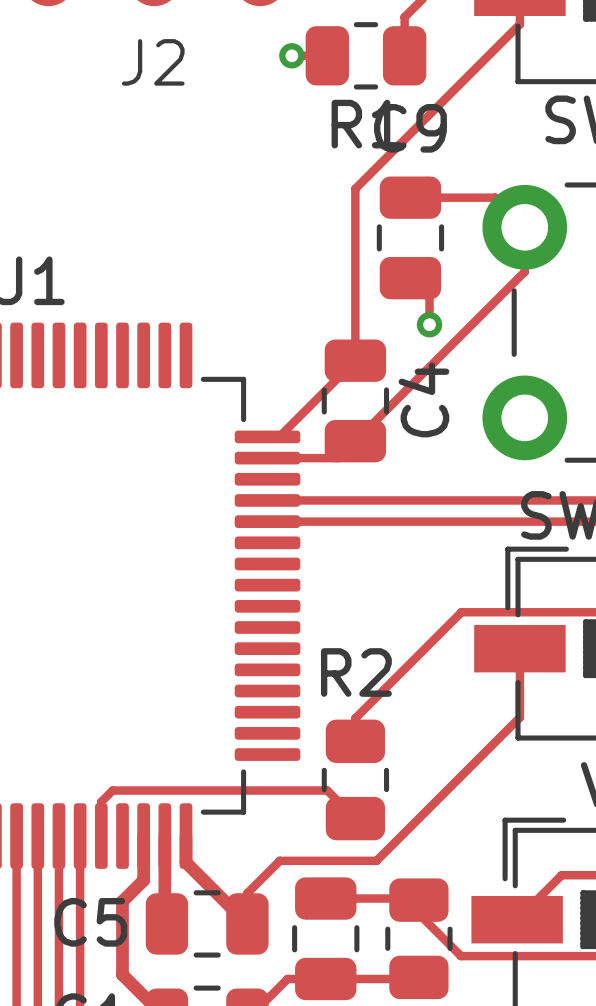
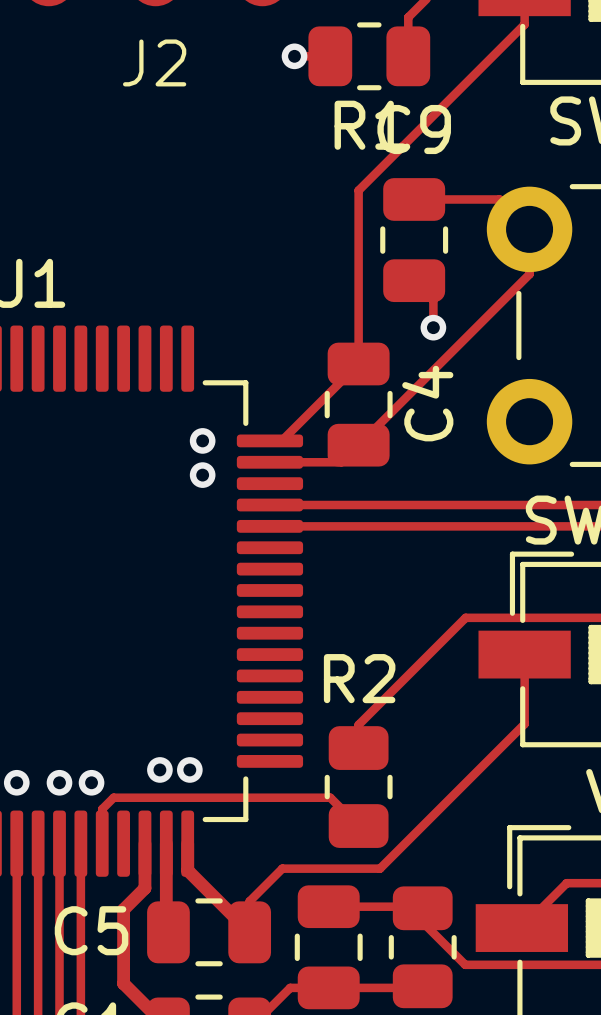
via: none -> (202, 440)
via: none -> (202, 475)
via: none -> (159, 769)
via: none -> (189, 769)
via: none -> (16, 782)
via: none -> (59, 782)
via: none -> (91, 782)

